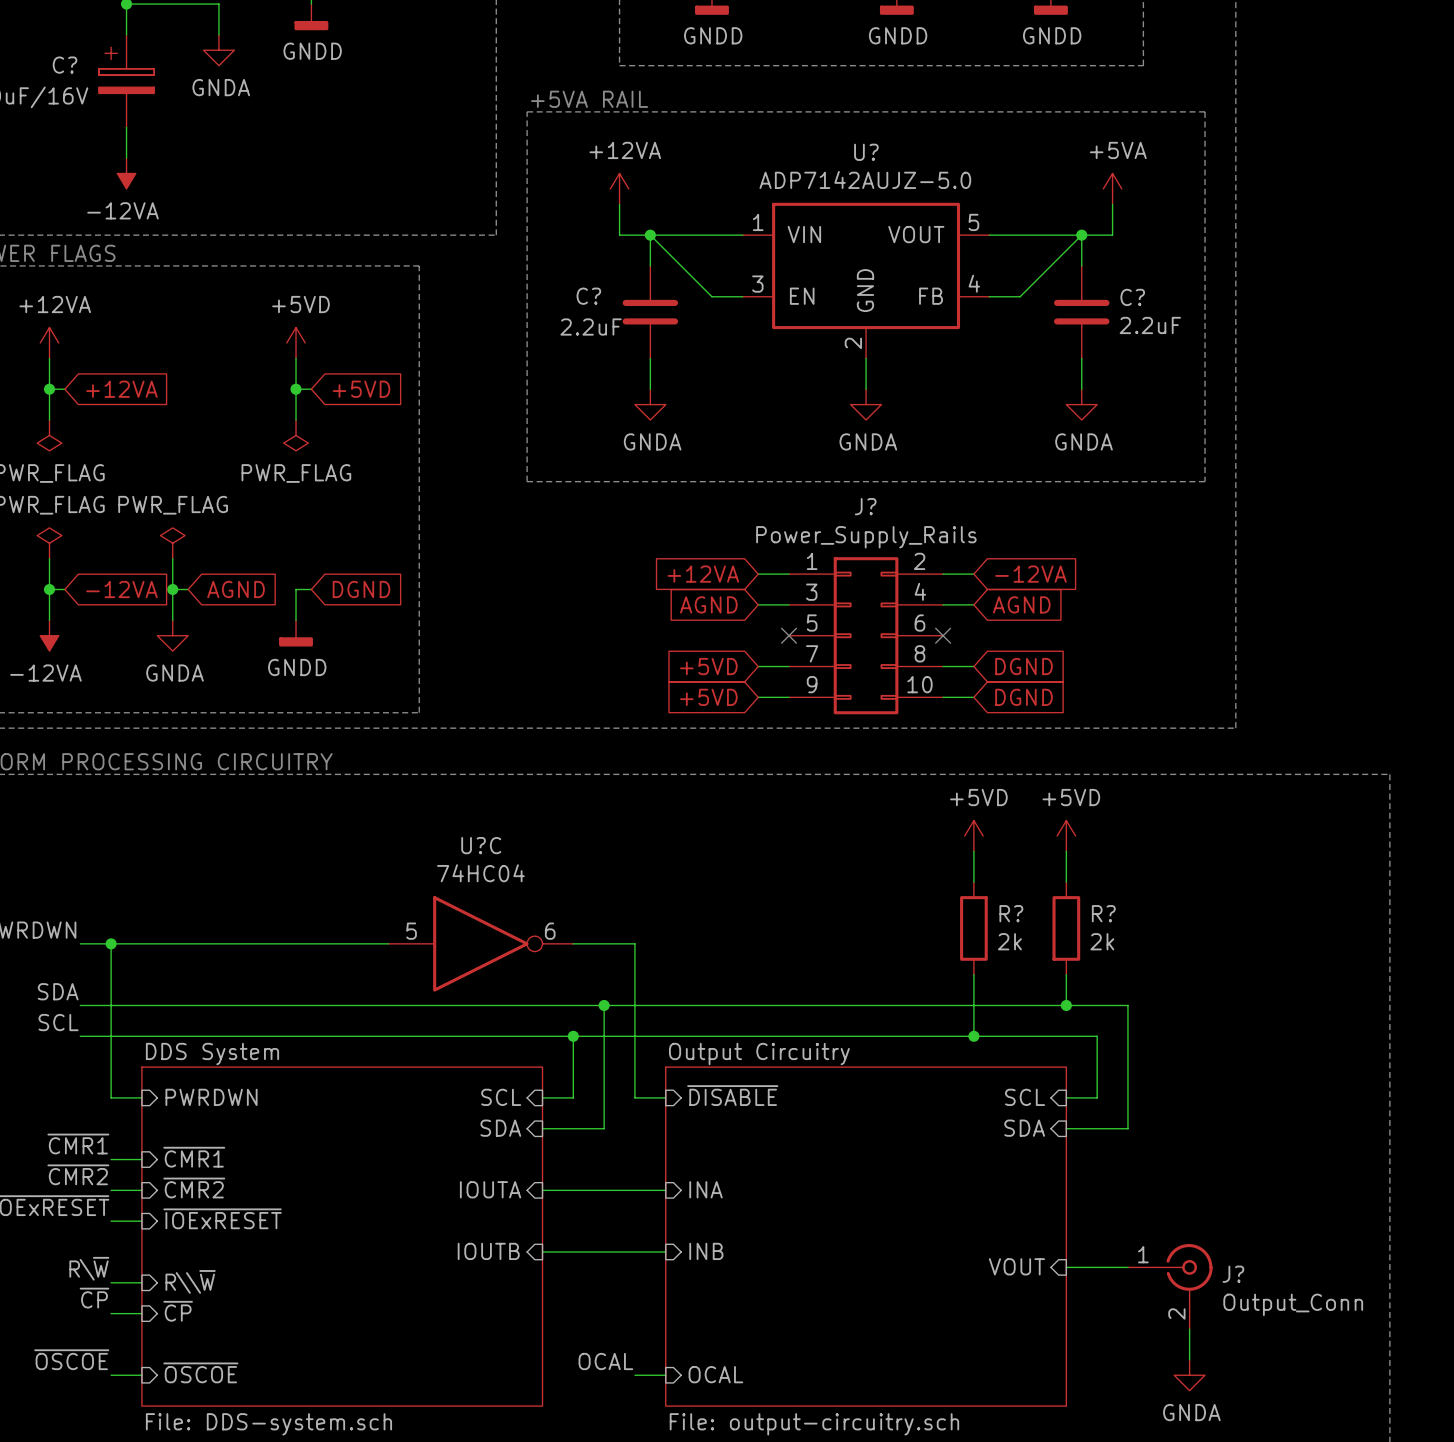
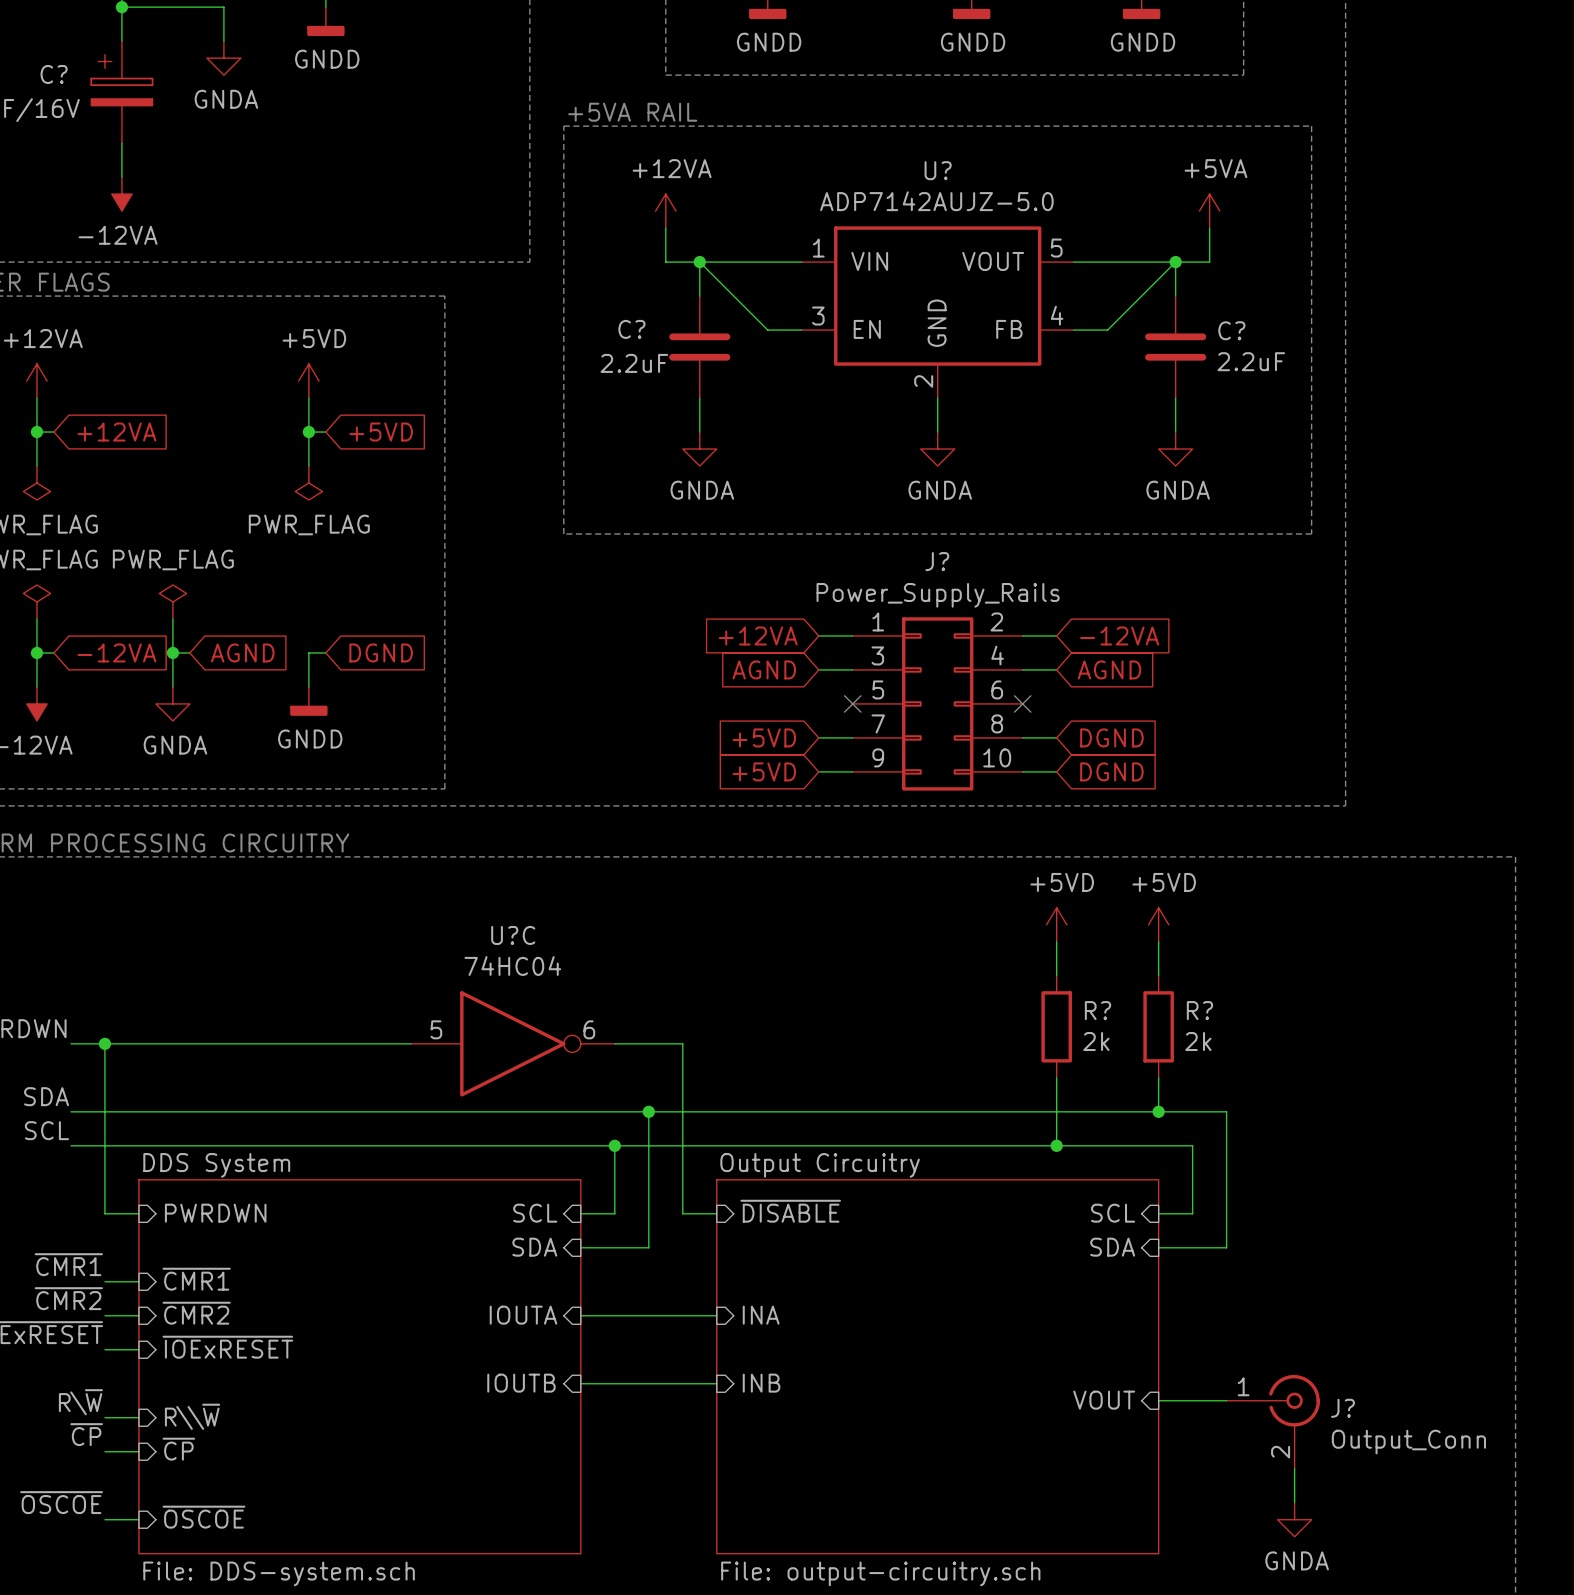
label: OCAL (605, 1361) -> none
sheet pin: OCAL (715, 1374) -> none
wire: (634, 1375) (665, 1375) -> none

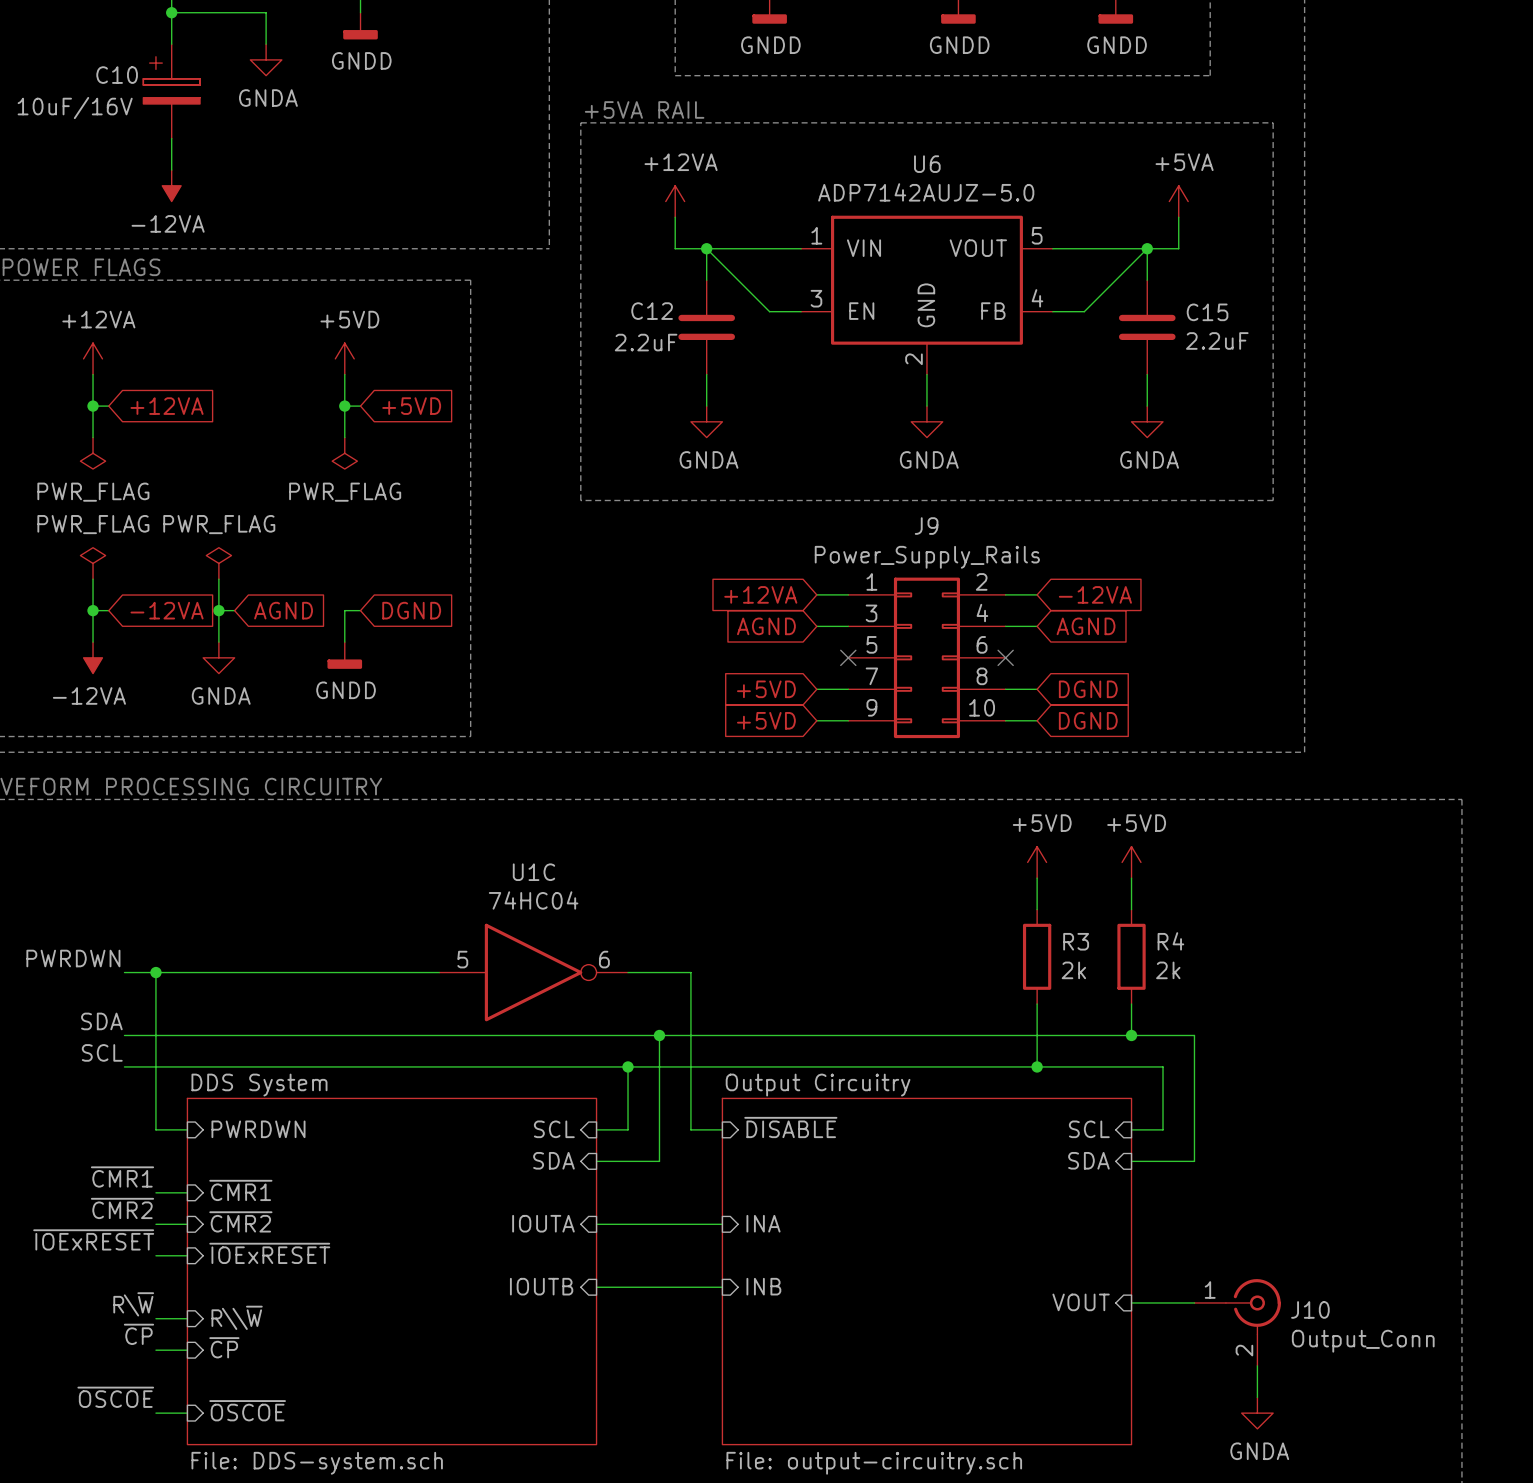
C? name: C? (54, 74) -> C10 (117, 75)
U? name: U? (938, 170) -> U6 (927, 164)
C? name: C? (631, 329) -> C12 (652, 311)
C? name: C? (1231, 330) -> C15 (1207, 312)
J? name: J? (937, 561) -> J9 (926, 526)
U?C name: U?C (513, 935) -> U1C (533, 872)
R? name: R? (1098, 1010) -> R3 (1076, 941)
R? name: R? (1199, 1010) -> R4 (1170, 941)
J? name: J? (1342, 1408) -> J10 (1310, 1309)

